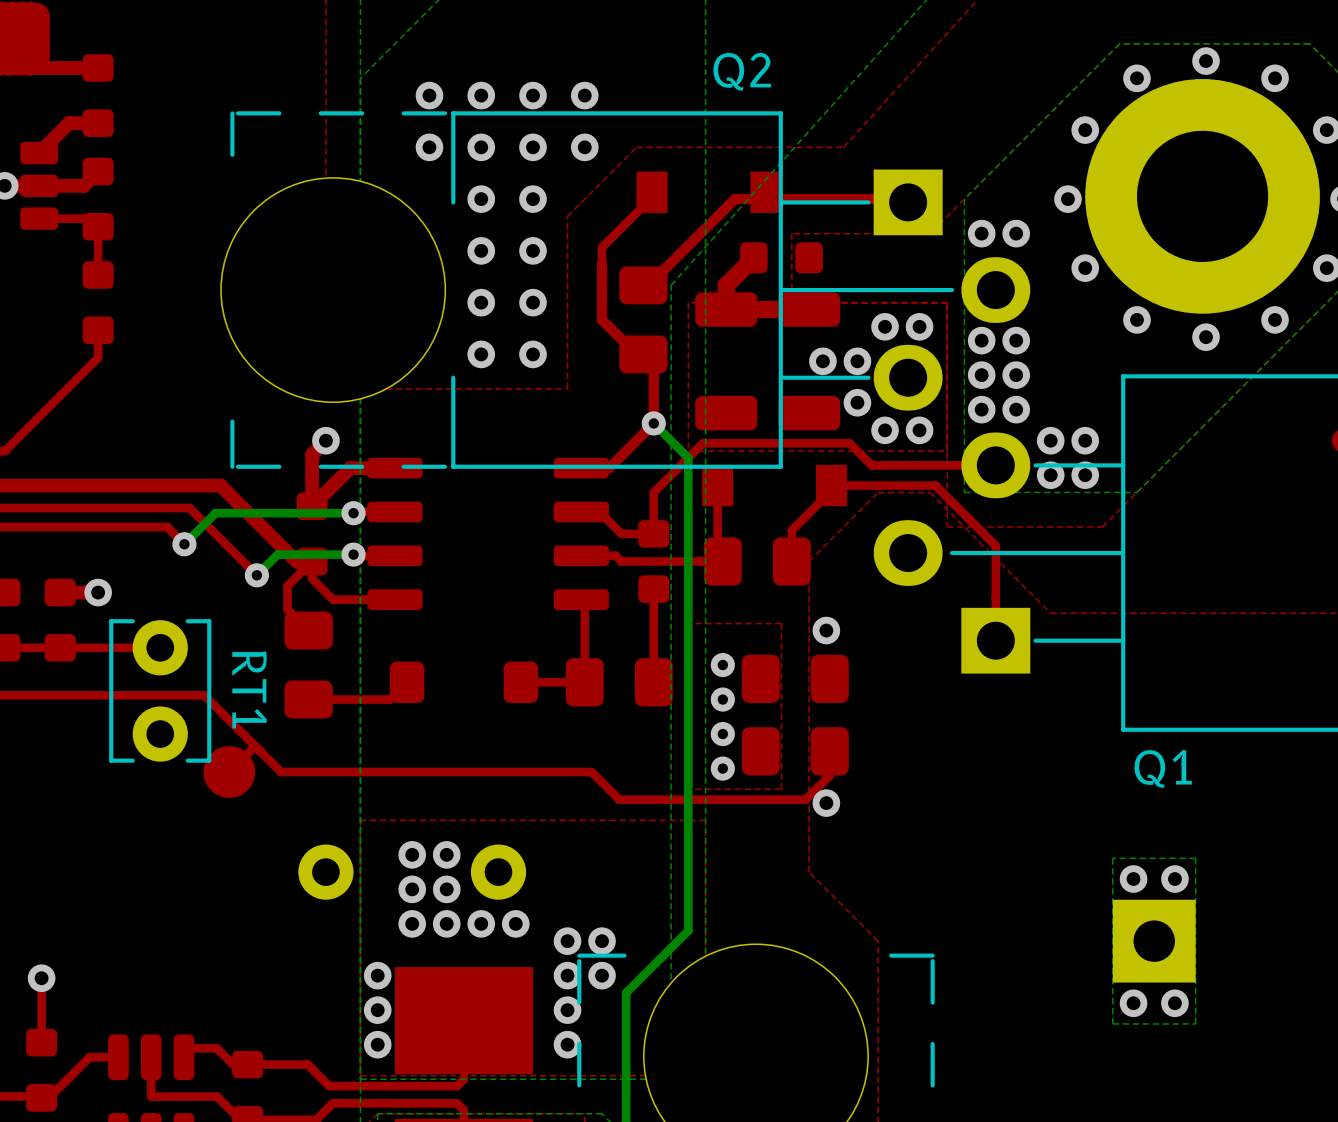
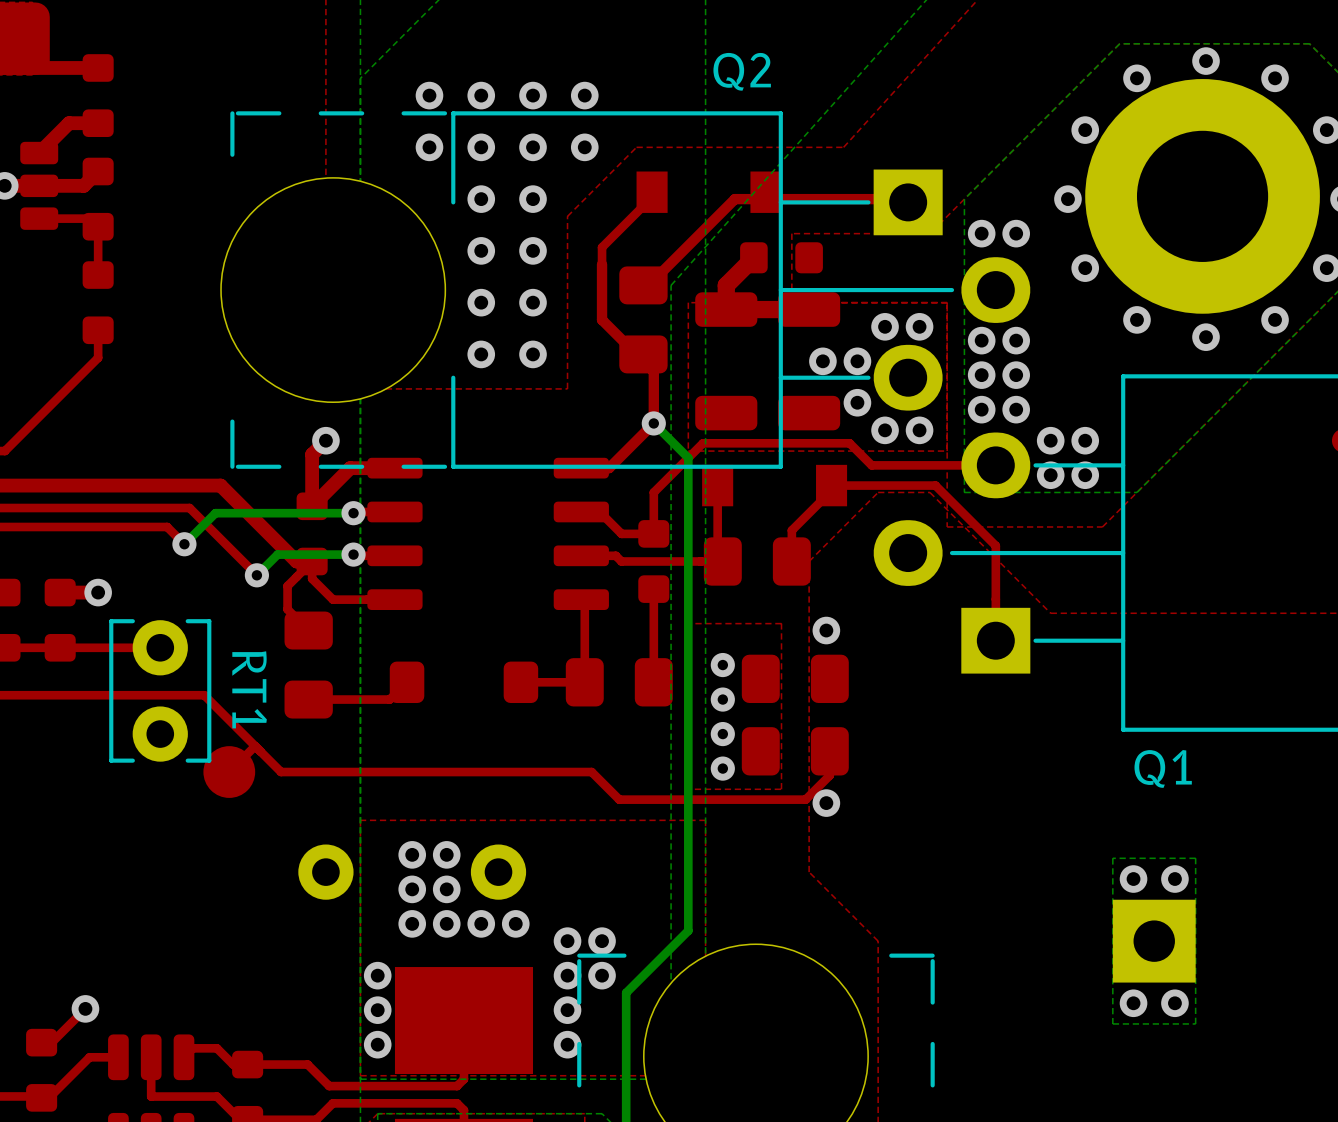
top track: (41, 978) (41, 1042) -> none
via position: (41, 978) -> (85, 1008)
top track: none -> (85, 1008) (51, 1042)

